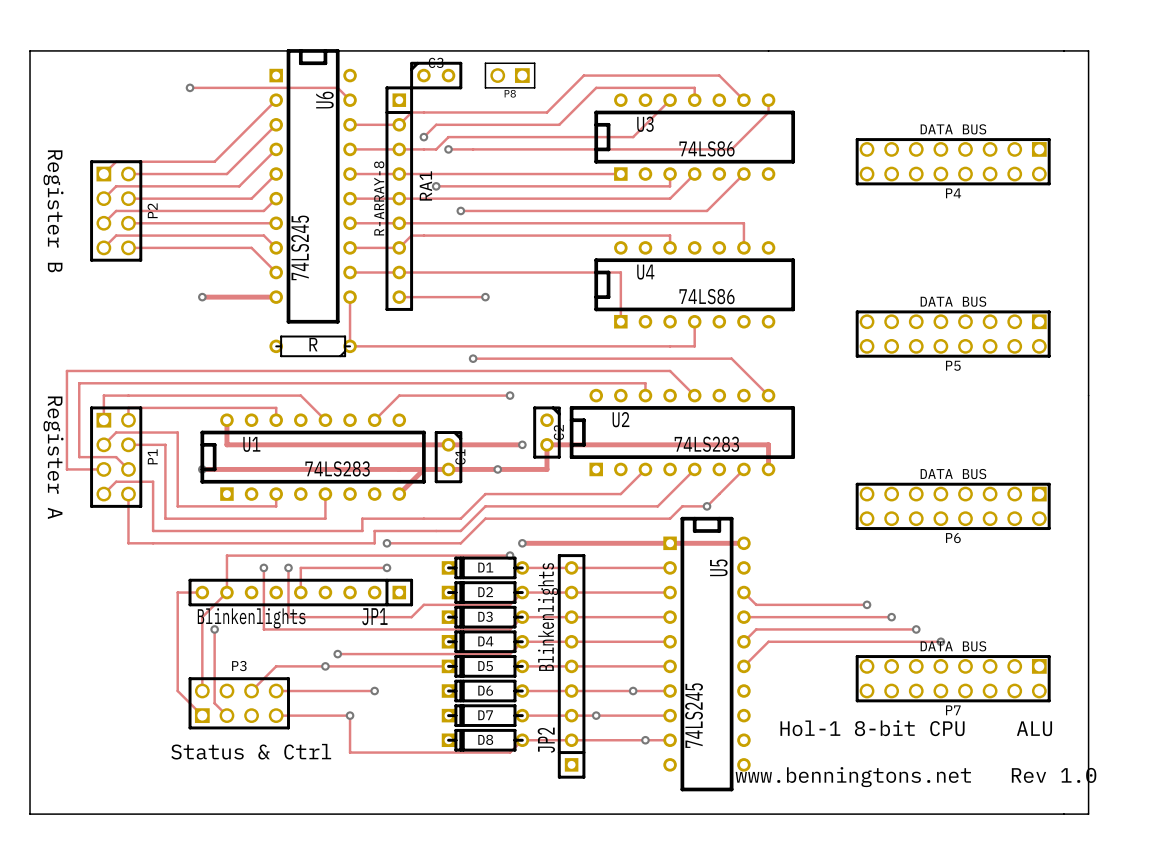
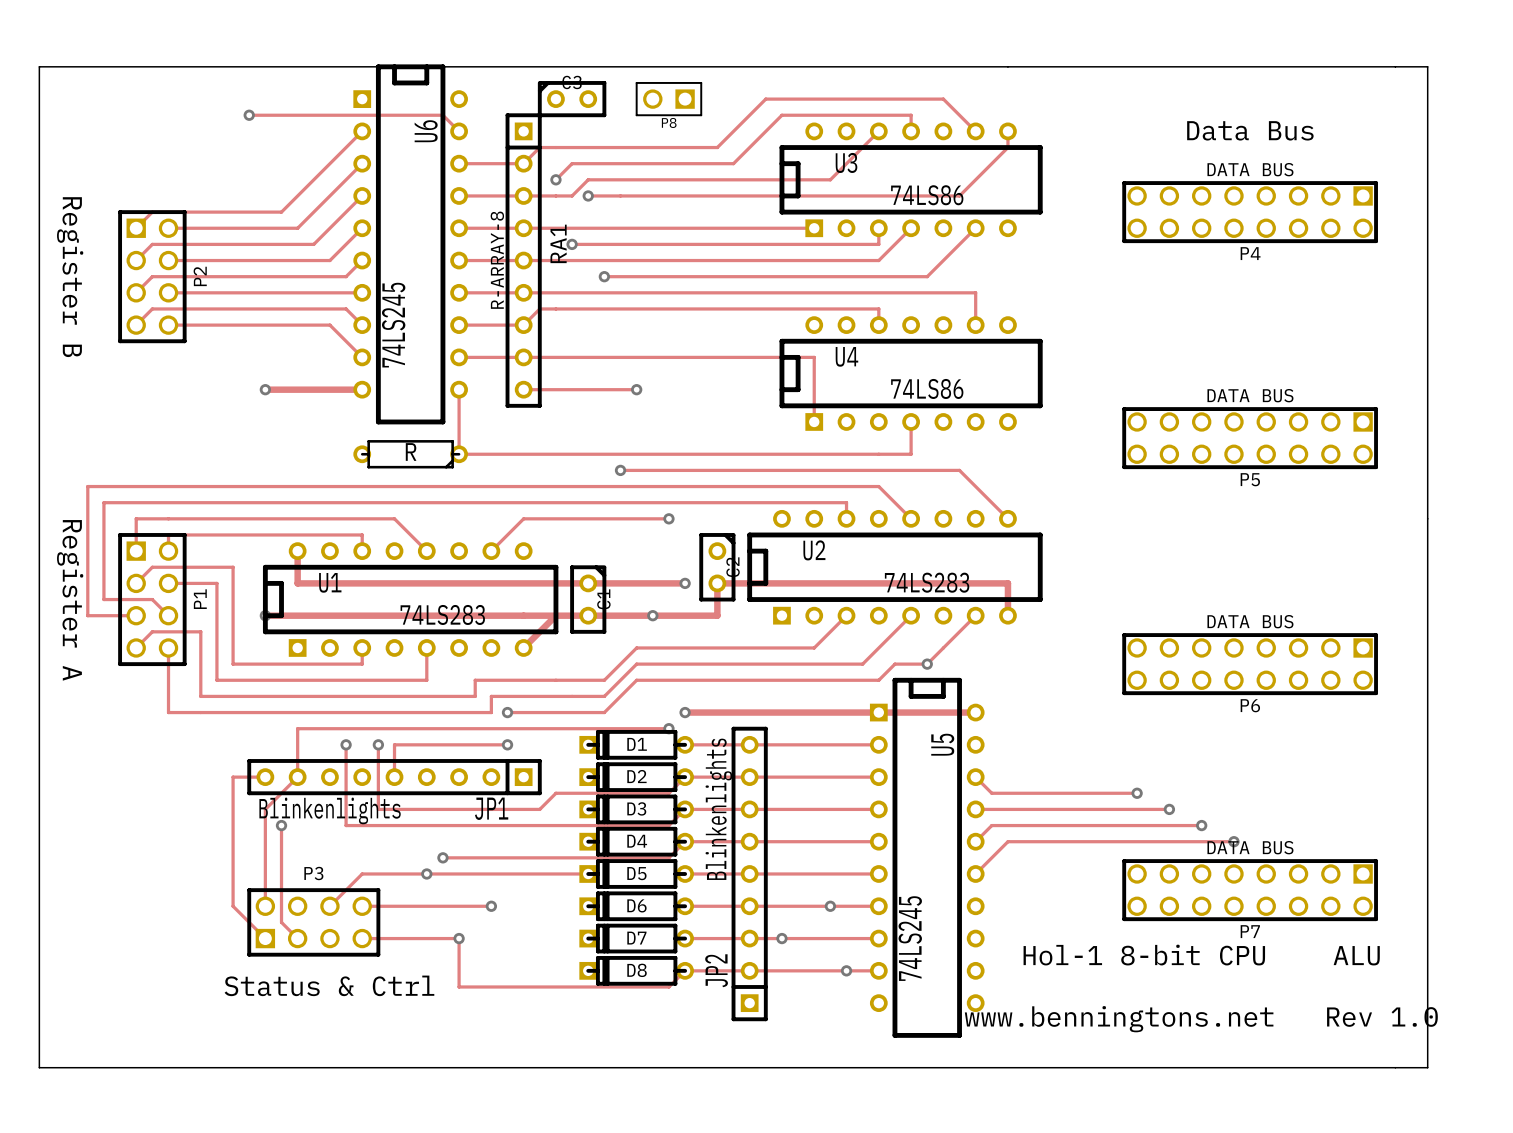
text: none -> Data Bus (1250, 130)

